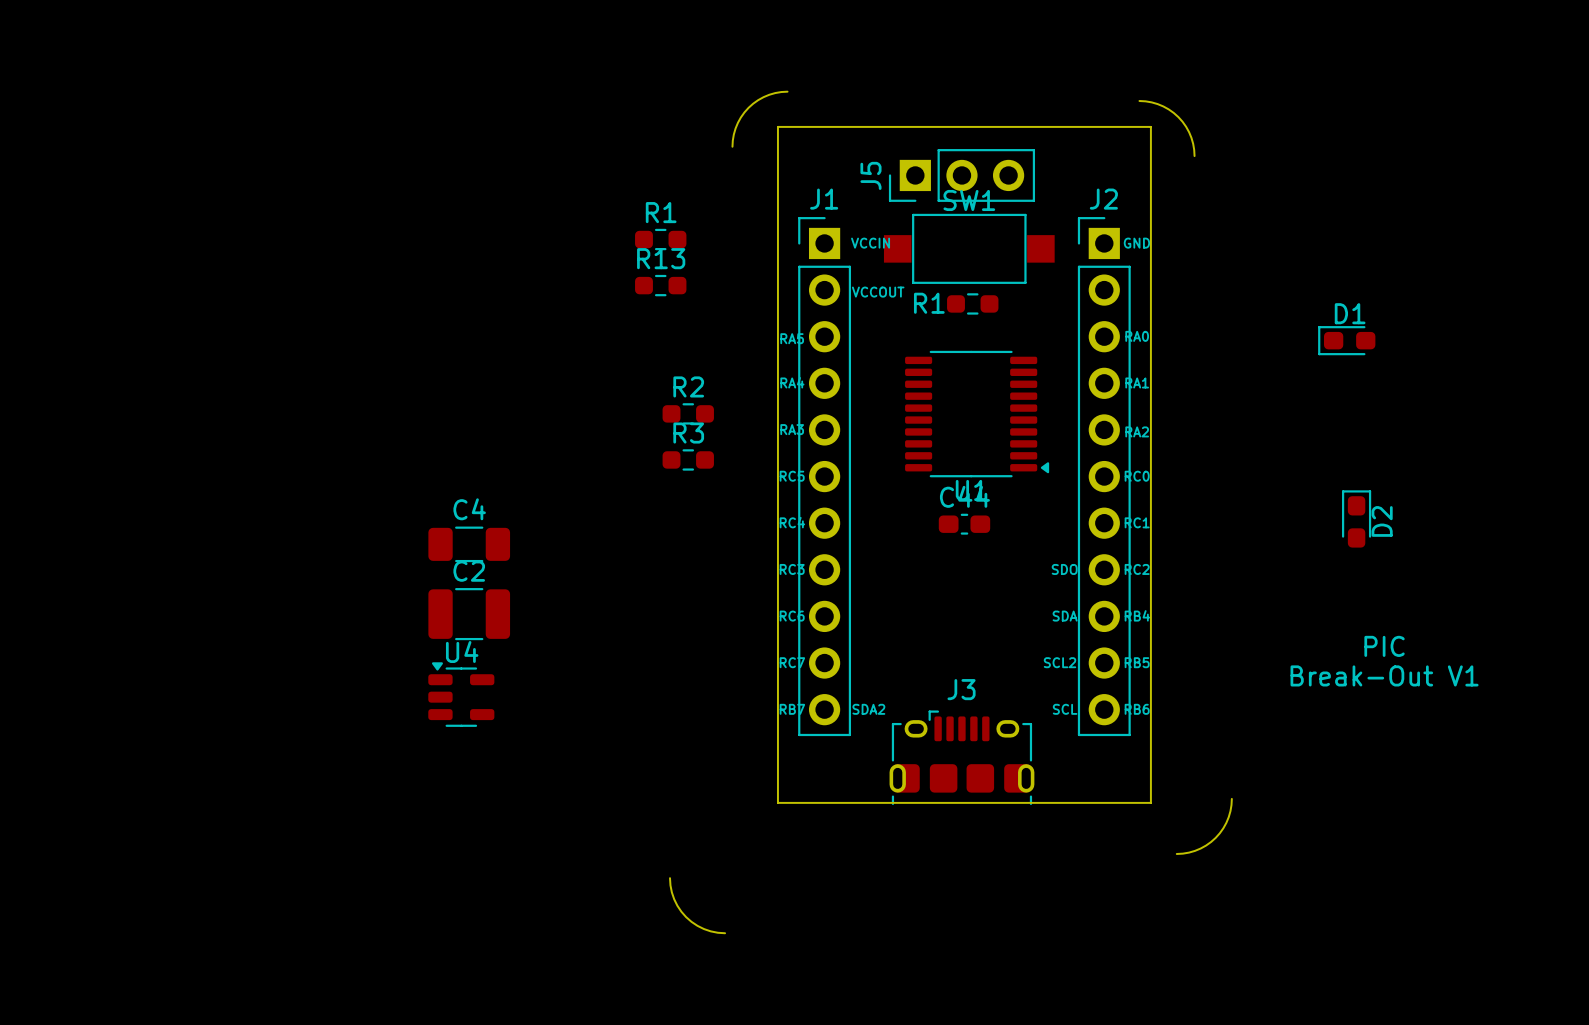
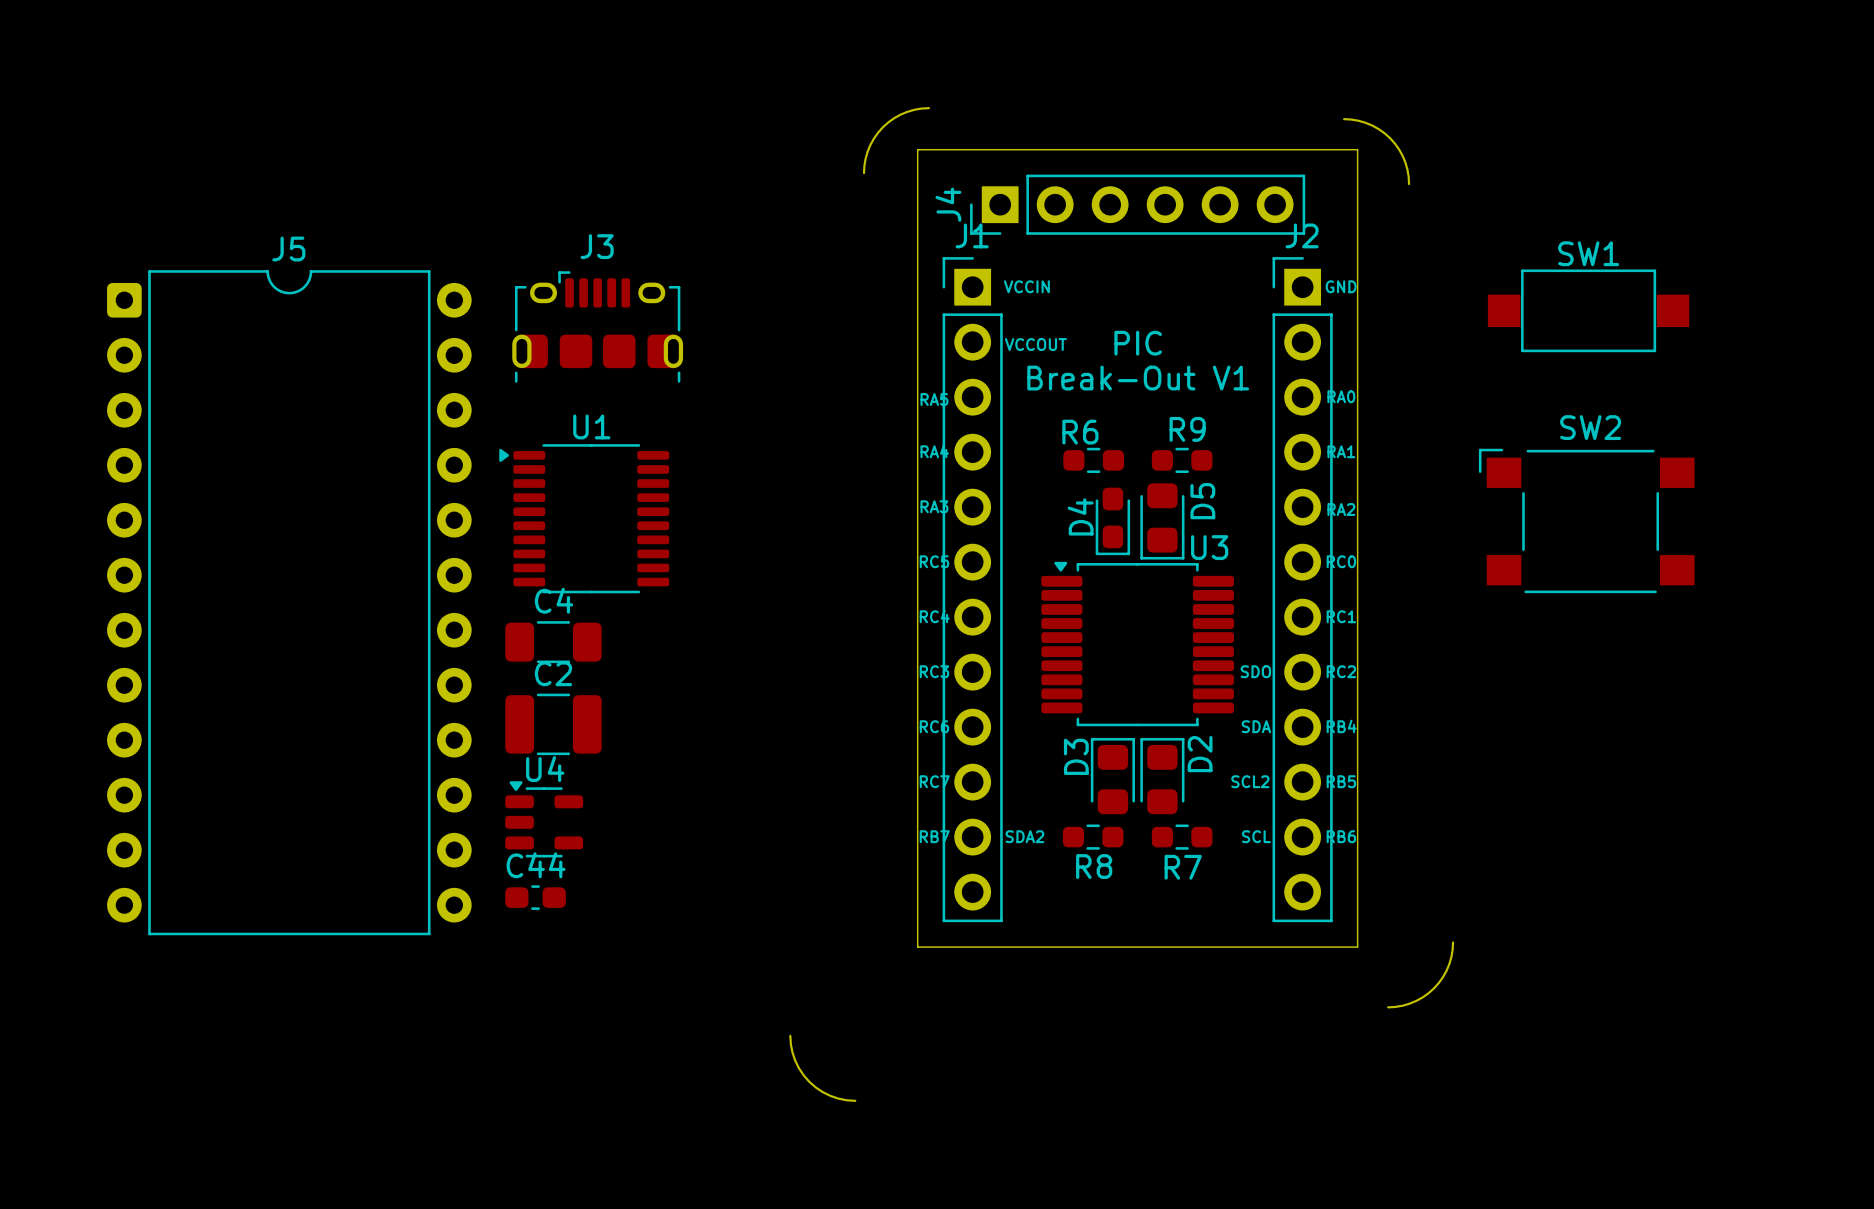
J5 footprint: [888, 149, 1036, 202] -> [107, 270, 472, 936]
J4: none -> (1137, 204)
J5 name position: J5 (870, 175) -> J5 (288, 249)
J1 footprint: [798, 217, 852, 737] -> [942, 257, 1003, 923]
J2 footprint: [1077, 217, 1131, 737] -> [1272, 257, 1333, 923]
R1: (660, 239) -> none
SW1 position: (969, 248) -> (1588, 310)
R13: (660, 285) -> none
text: none -> PIC (1138, 343)
R1: (972, 303) -> none
text: none -> Break-Out V1 (1138, 378)
D1: (1346, 340) -> none
R6: none -> (1093, 460)
R9: none -> (1182, 460)
R2: (688, 413) -> none
U1 rotation: 0° (977, 414) -> 180° (584, 518)
U1 position: (977, 414) -> (584, 518)
SW2: none -> (1586, 520)
D4: none -> (1112, 521)
D5: none -> (1162, 521)
R3: (688, 459) -> none
D2 footprint: [1341, 490, 1372, 548] -> [1140, 737, 1185, 815]
C44 position: (964, 524) -> (535, 897)
U3: none -> (1137, 644)
text: PIC (1384, 646) -> none
D3: none -> (1112, 776)
text: Break-Out V1 (1384, 675) -> none
R8: none -> (1093, 837)
R7: none -> (1182, 837)
J3 position: (961, 757) -> (597, 327)

